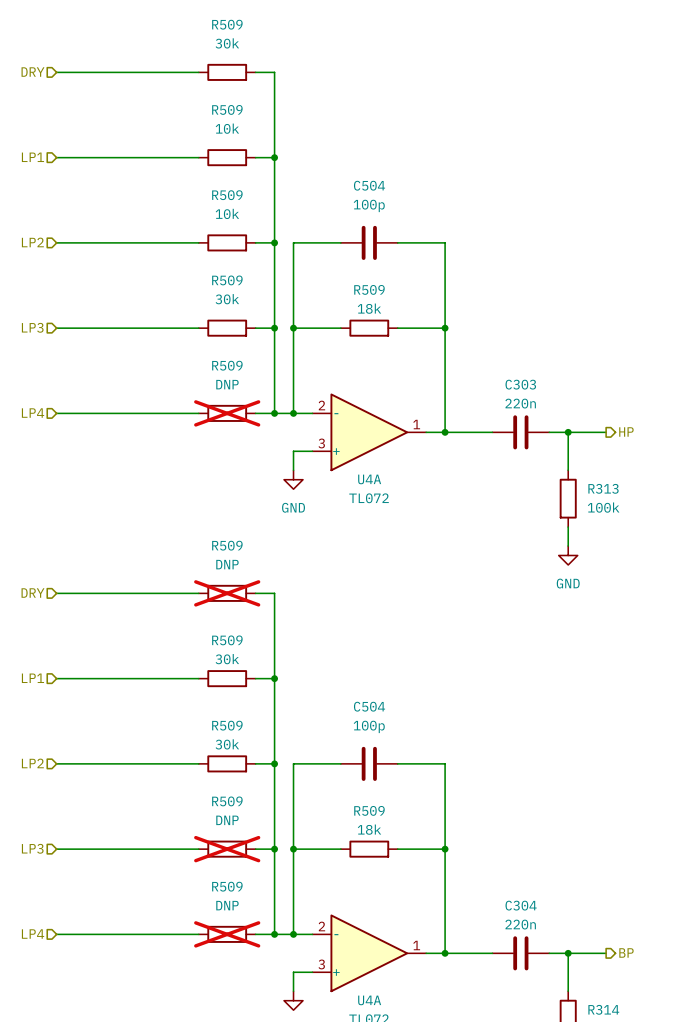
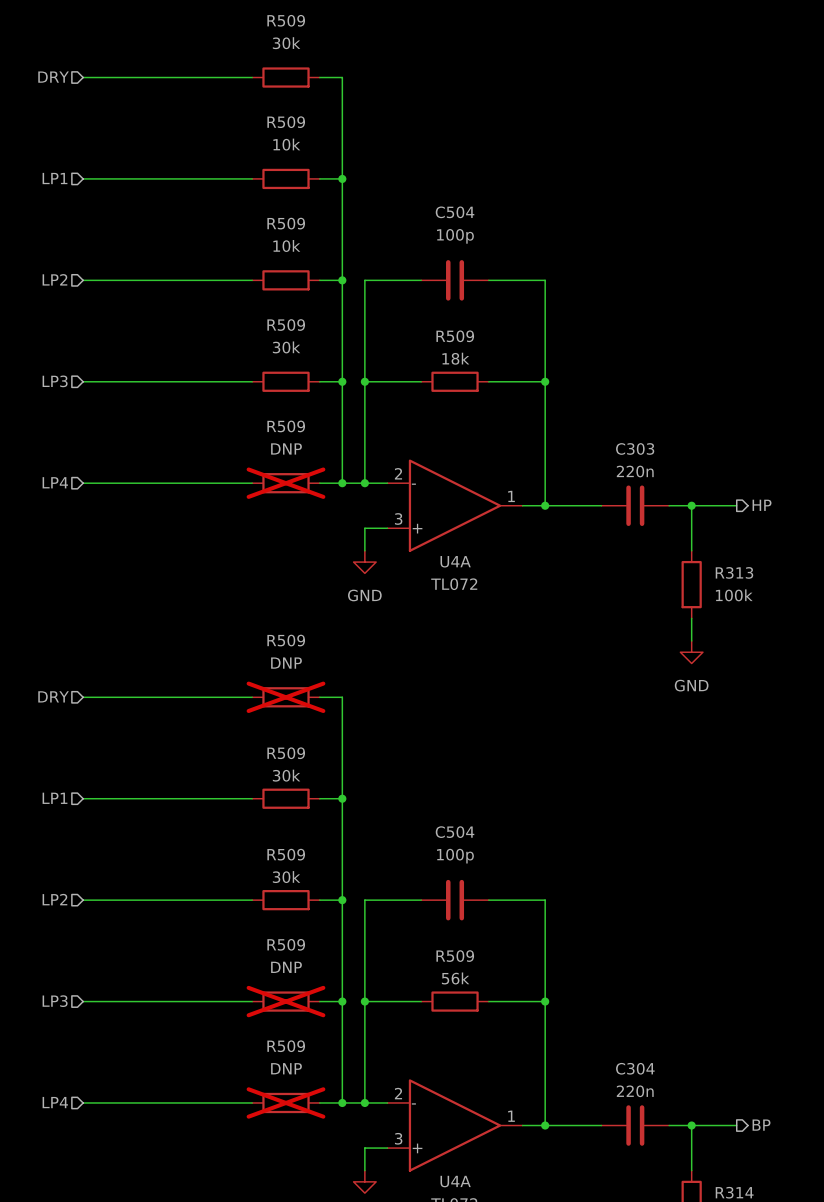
R509 value: 18k (369, 829) -> 56k (455, 978)

